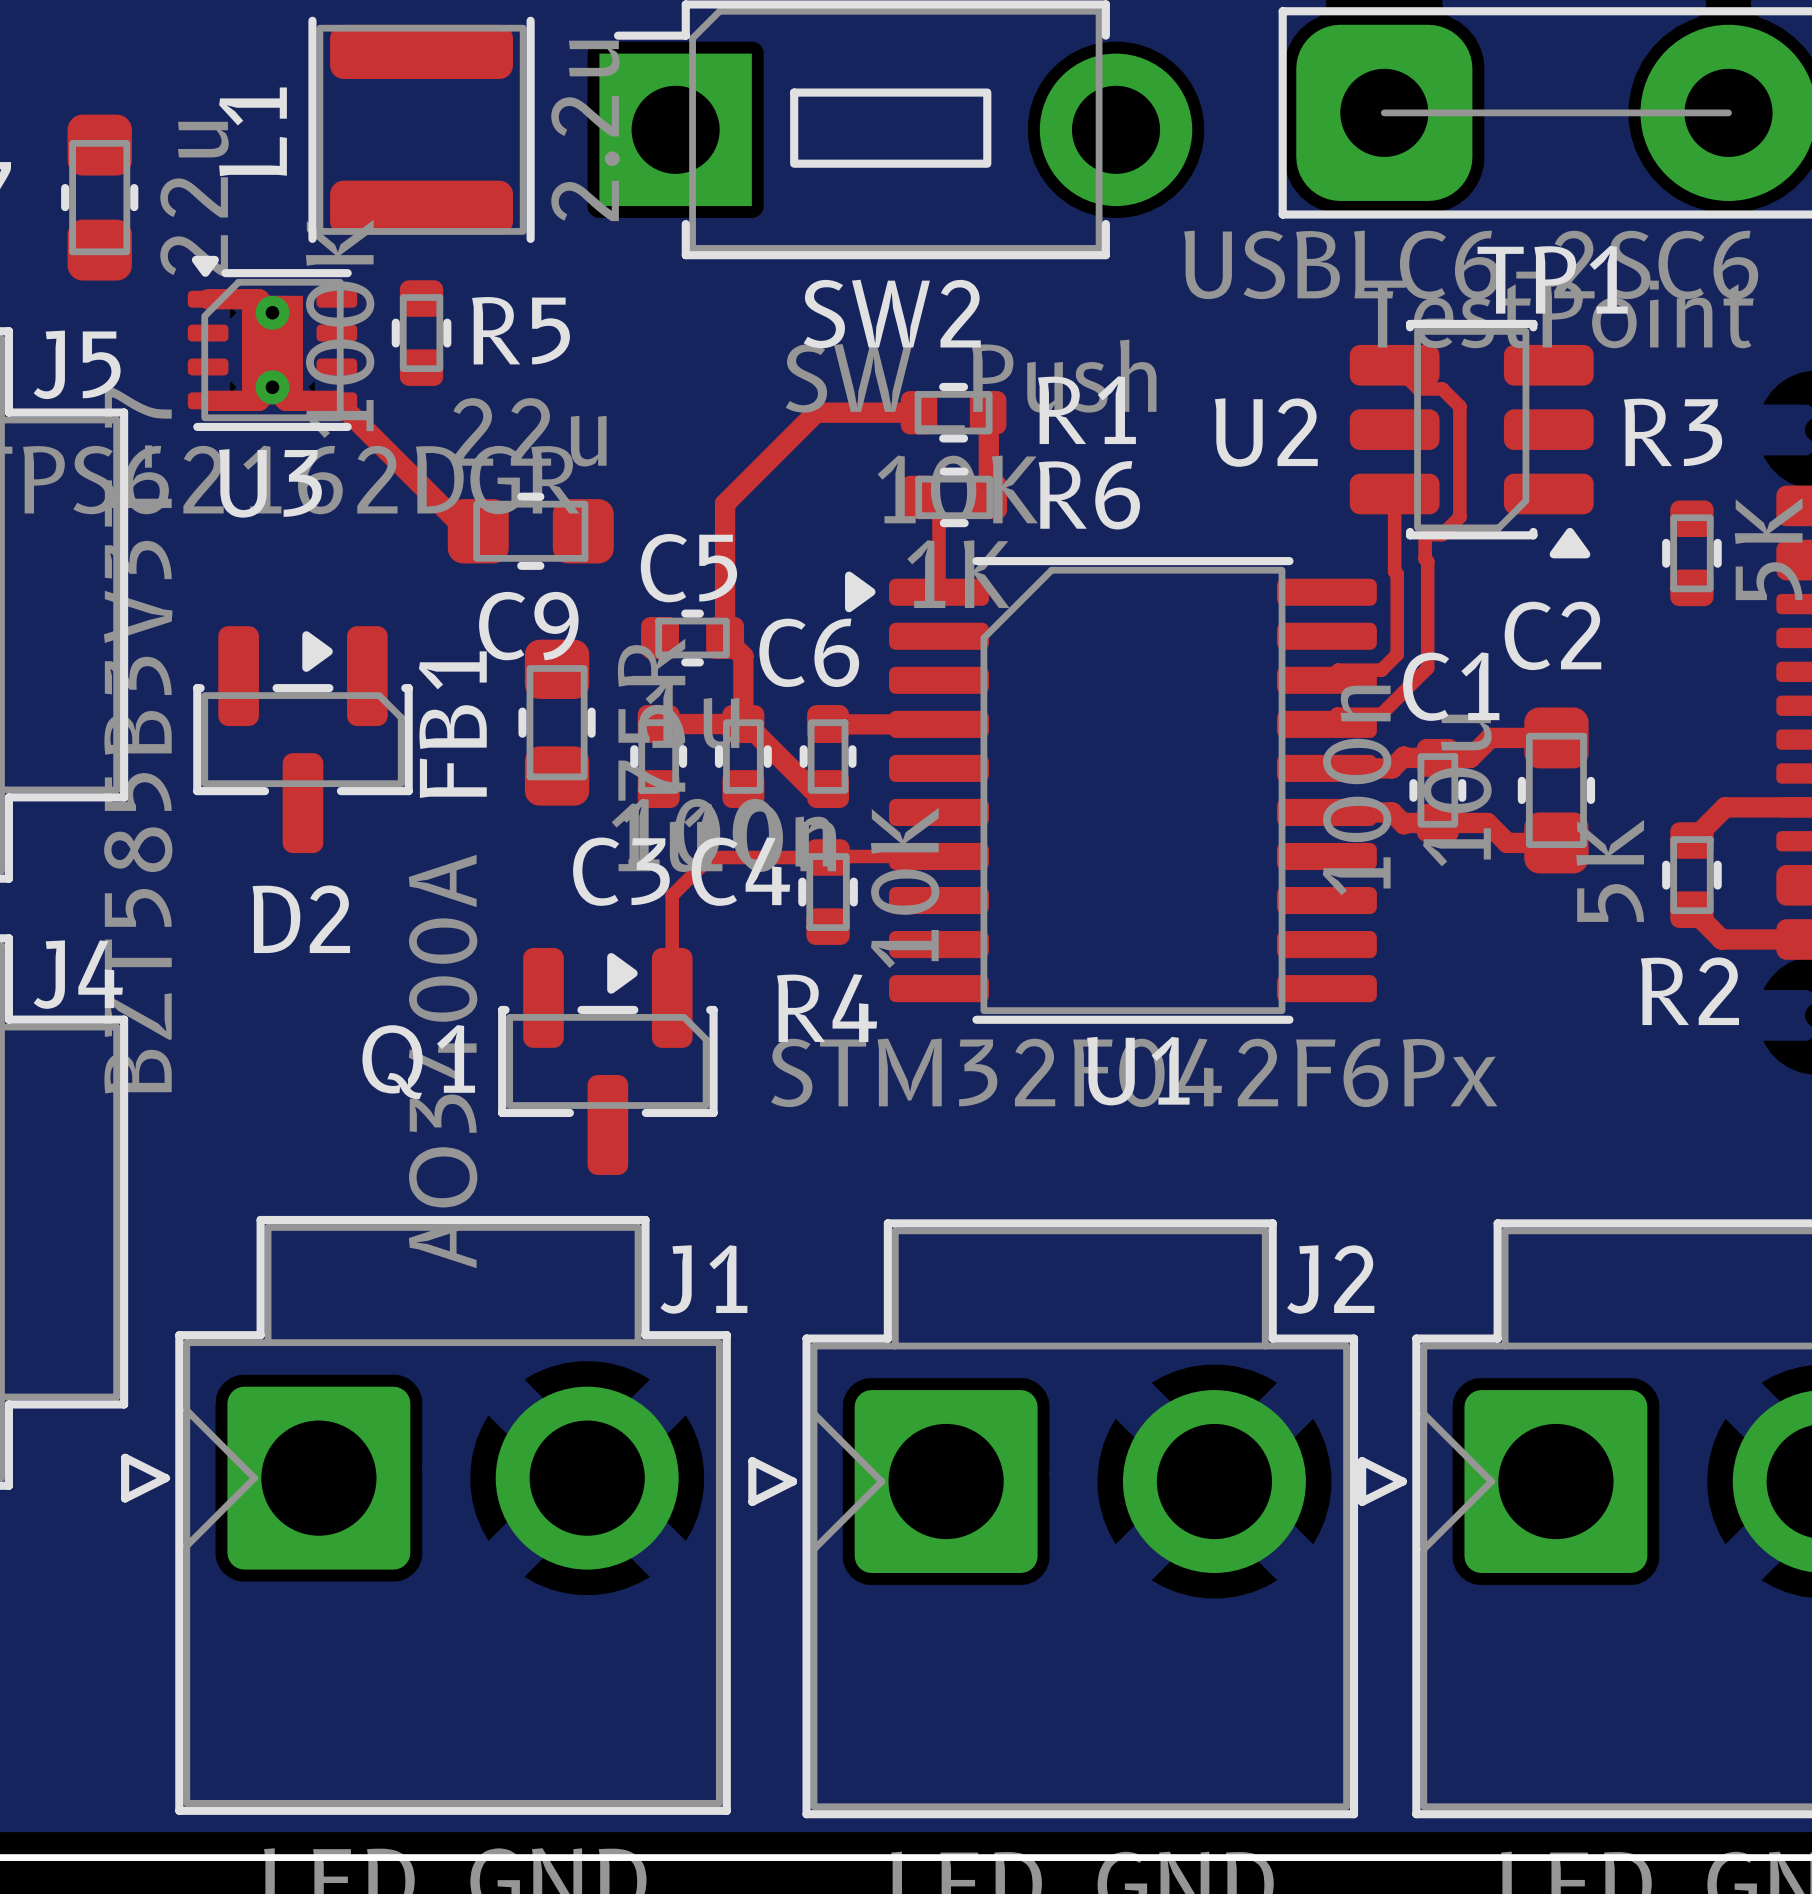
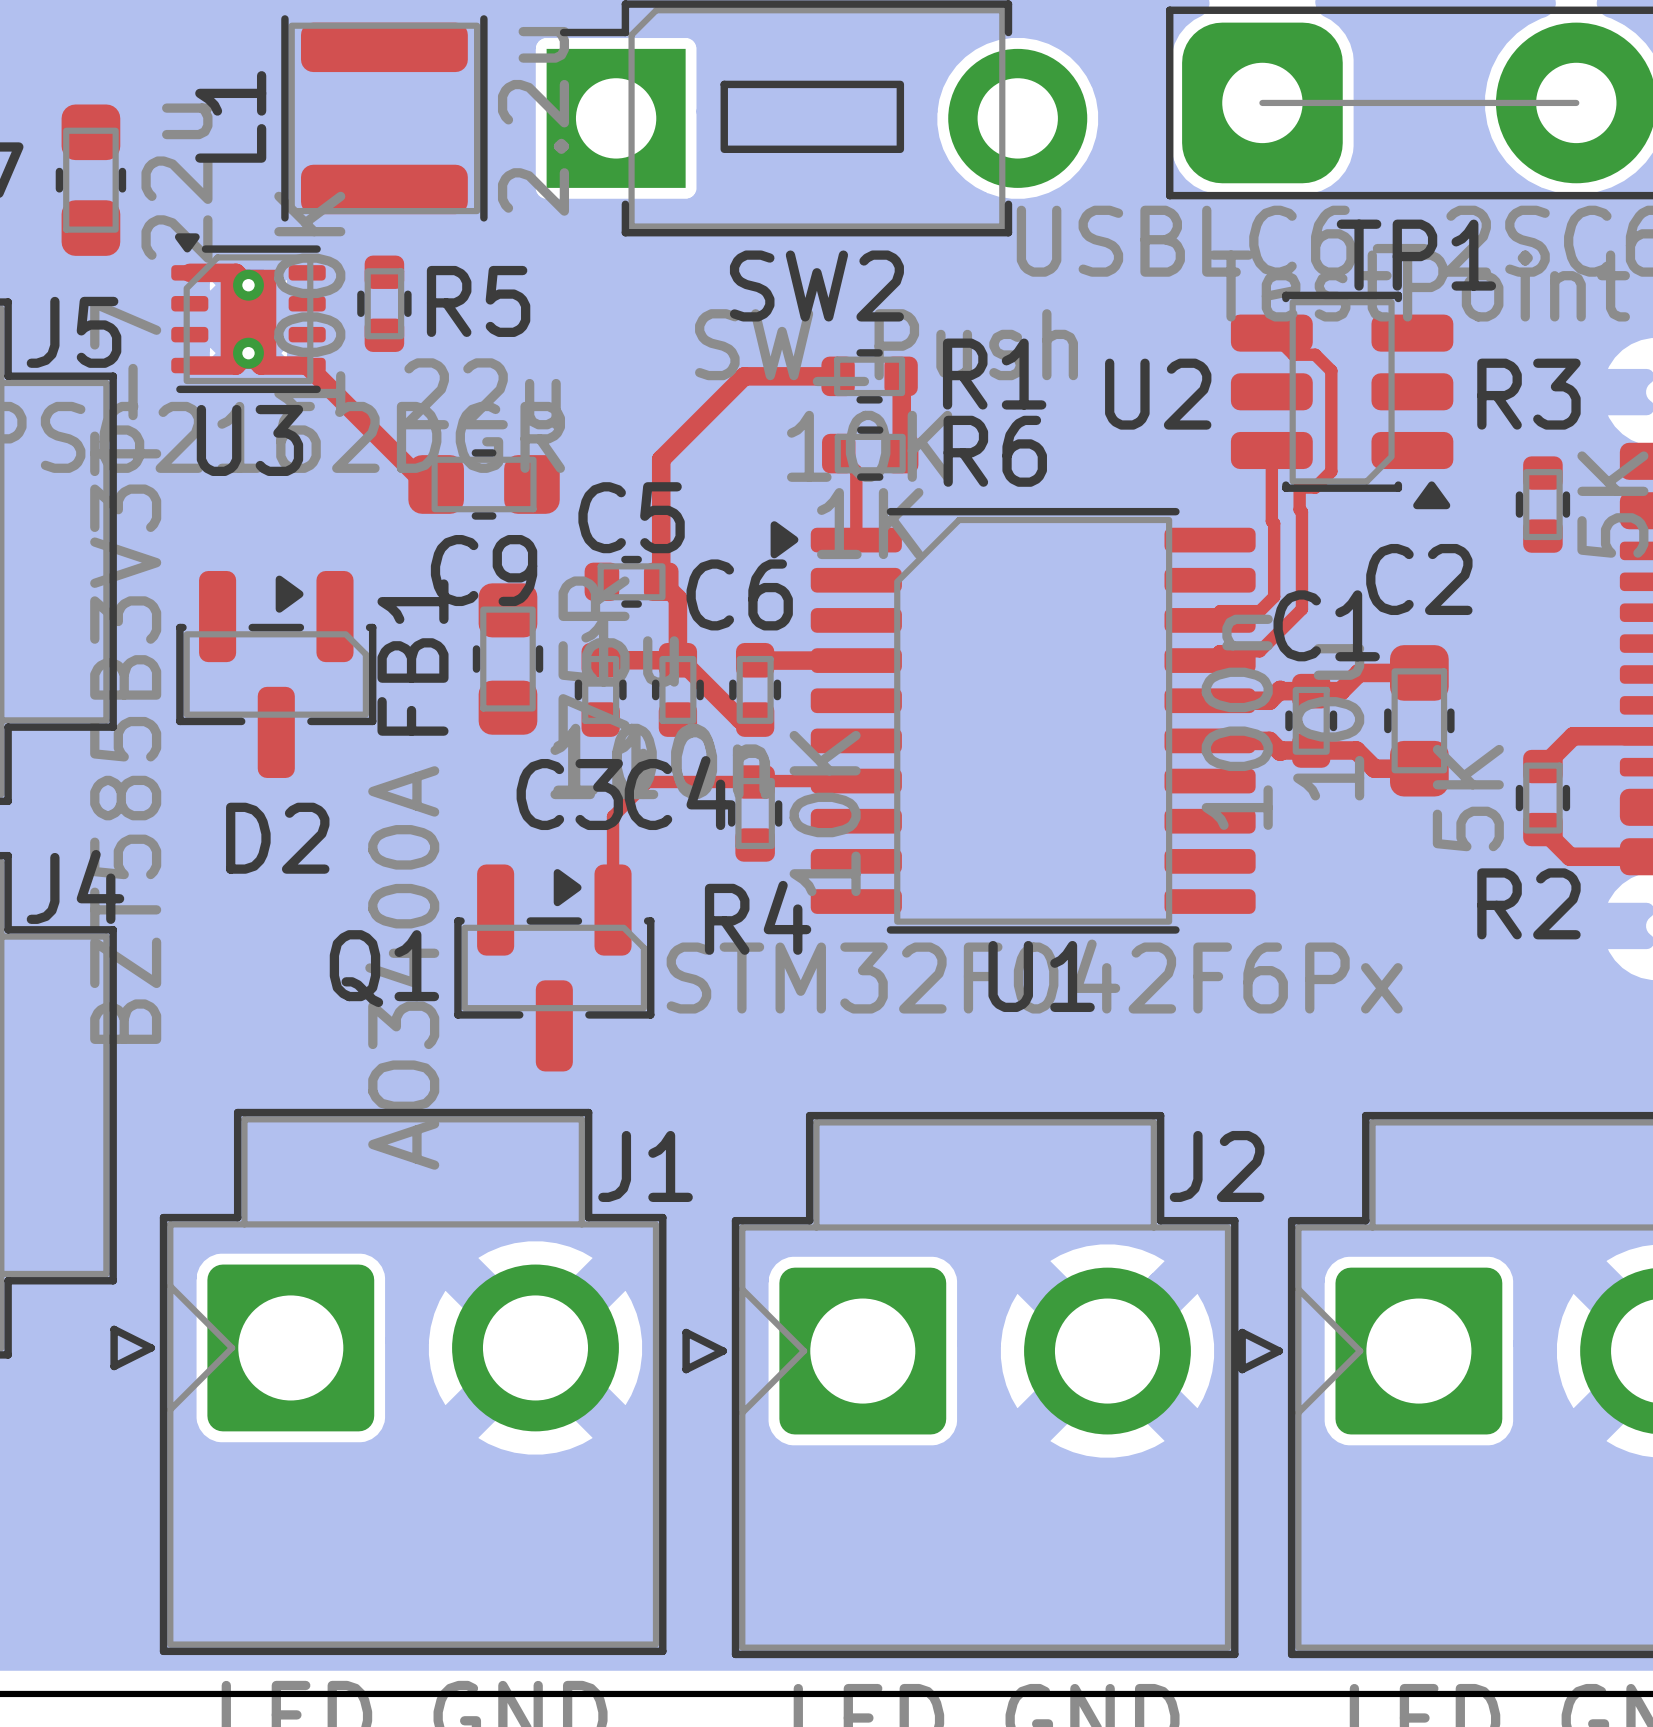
R2 name position: R2 (1689, 991) -> R2 (1528, 903)

